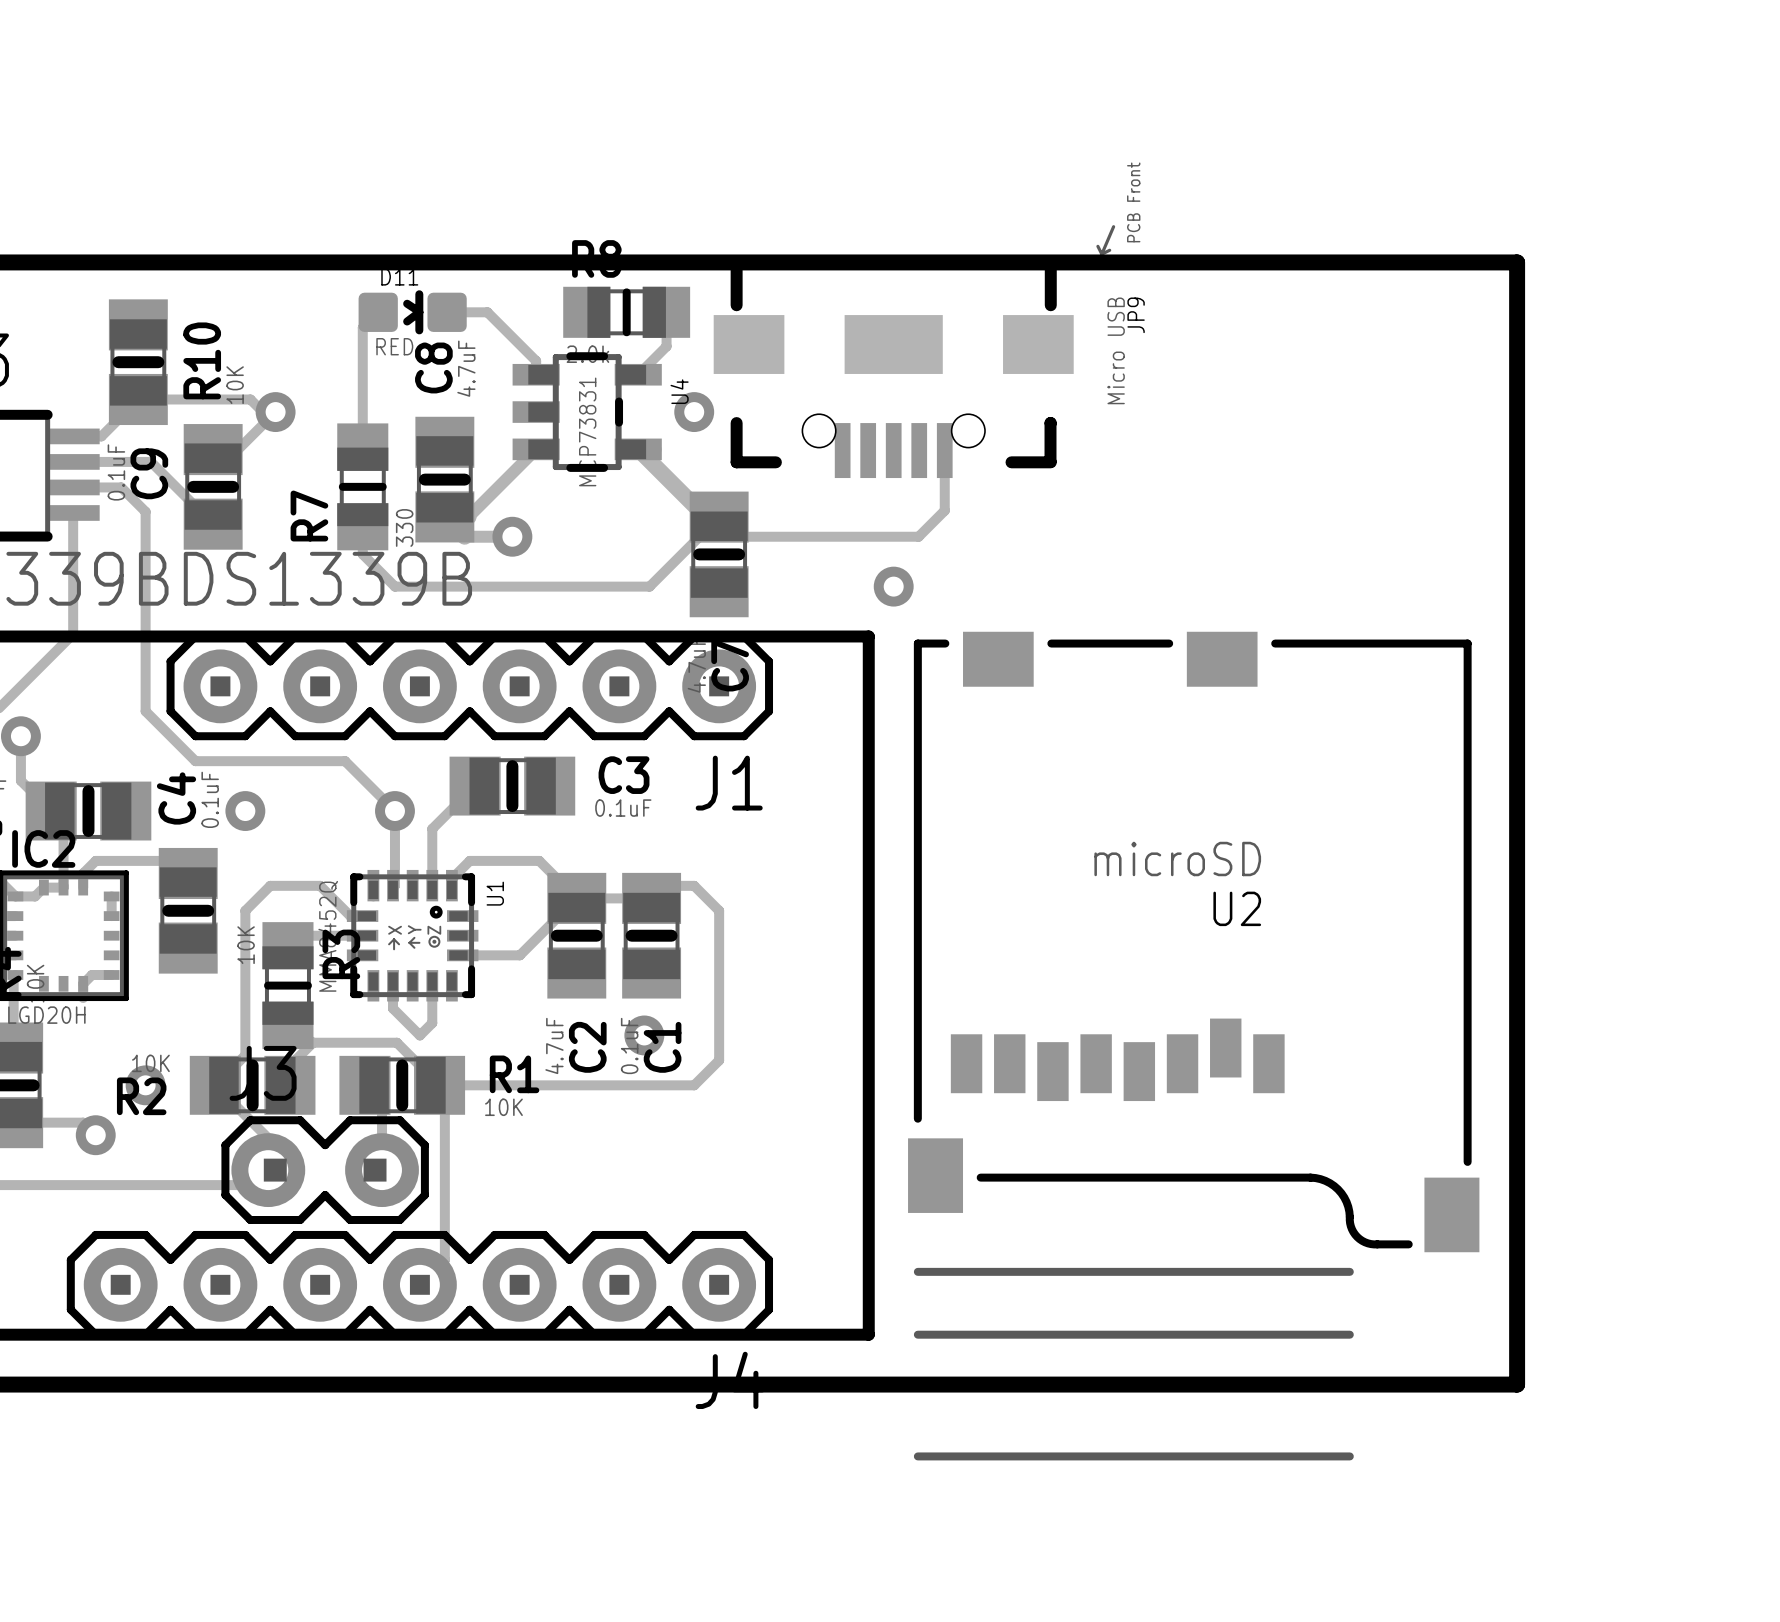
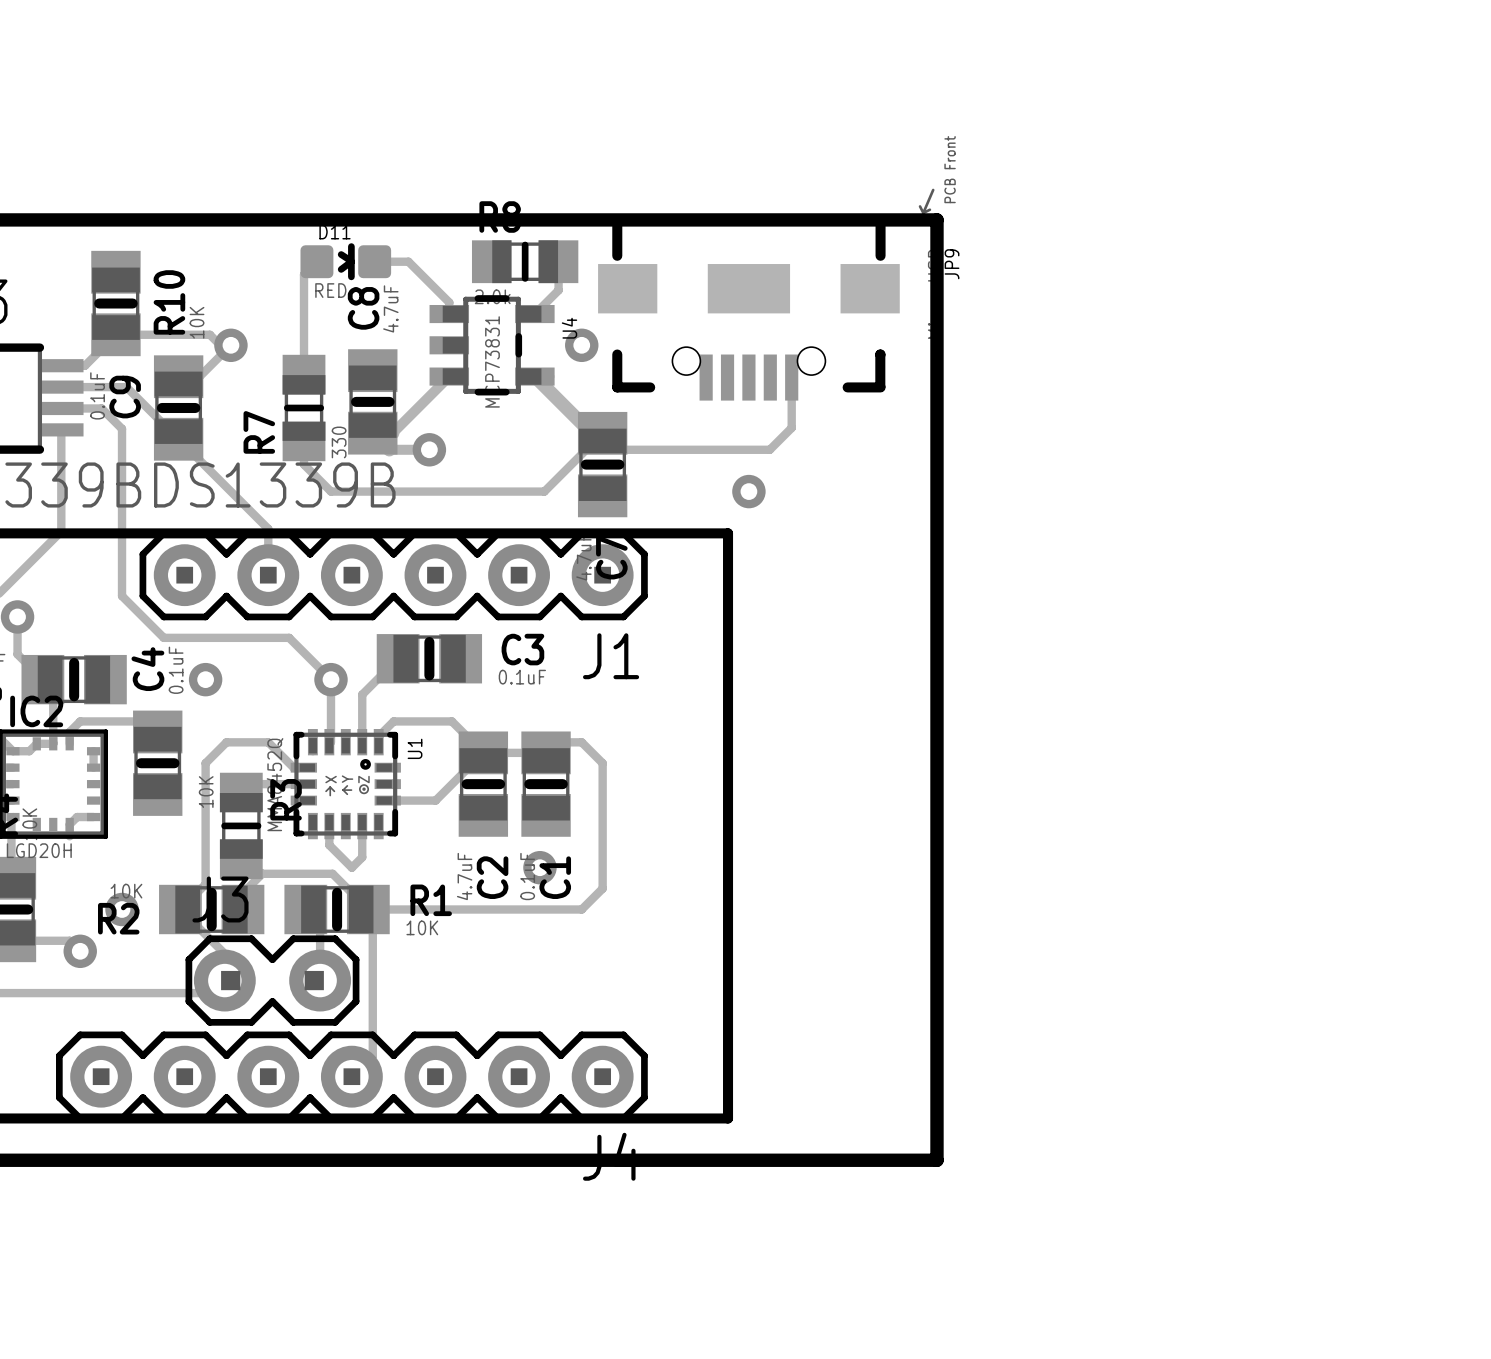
board edge: (1118, 262) (1517, 262) (1517, 1384) (1118, 1384) -> (936, 219) (936, 1160)
track: none -> (178, 439) (268, 528) (268, 575)
U2: microSD (1193, 1046) -> none

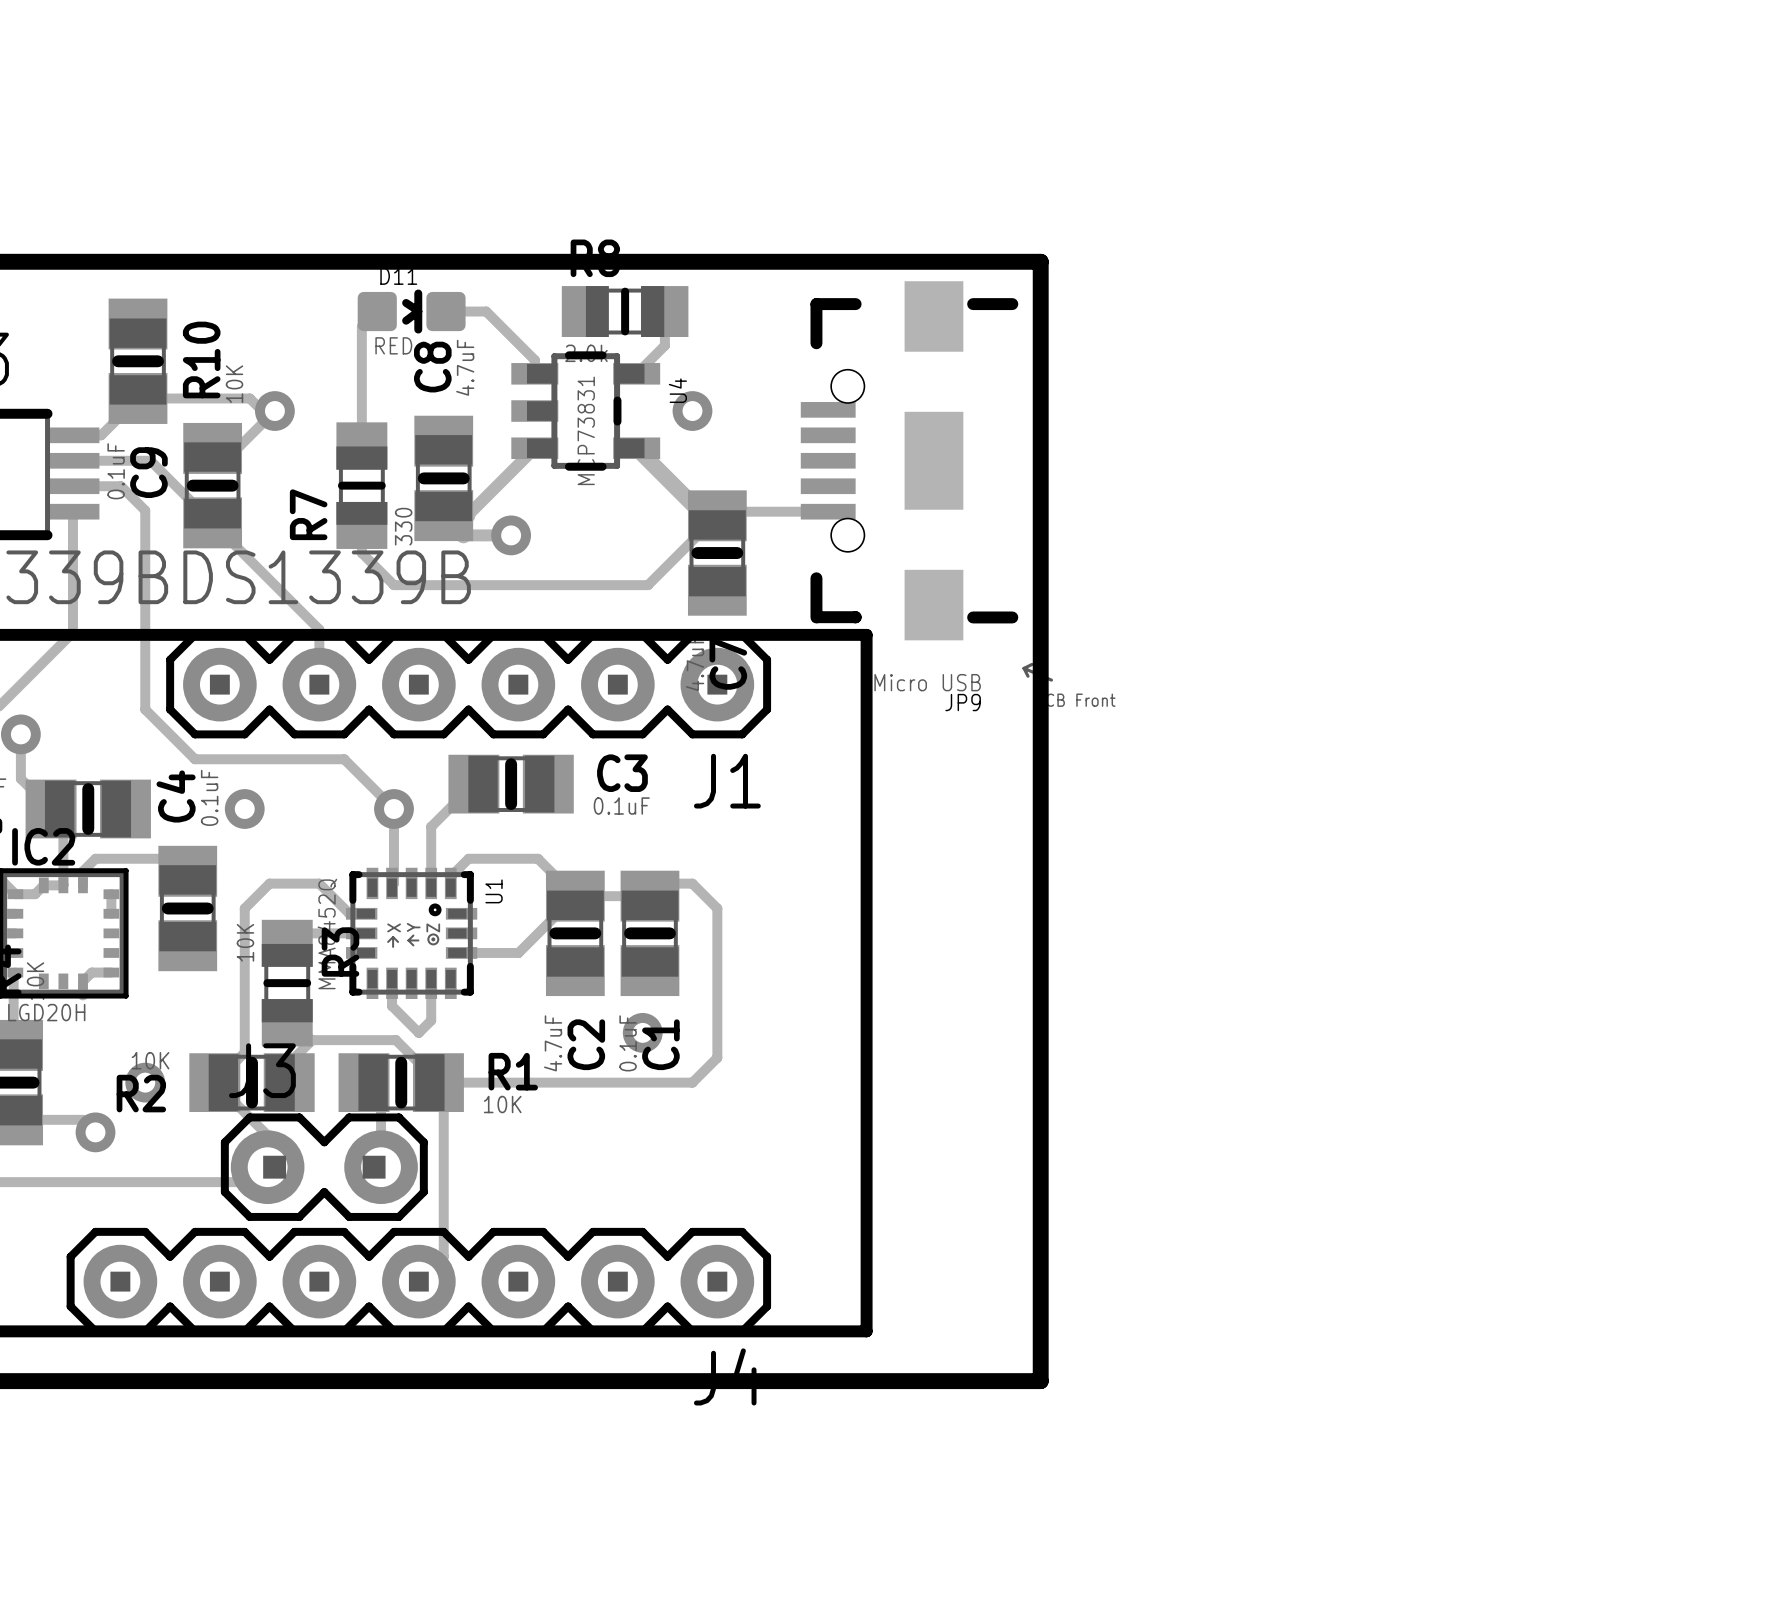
board edge: (874, 219) (936, 219) (936, 1160) (874, 1160) -> (1040, 261) (1040, 1381)
JP9 rotation: 0° (766, 294) -> 90° clockwise (926, 481)
track: (791, 377) (791, 427) (769, 449) (619, 449) (602, 433) -> (828, 511) (721, 511) (717, 515)
via: (748, 491) -> none

